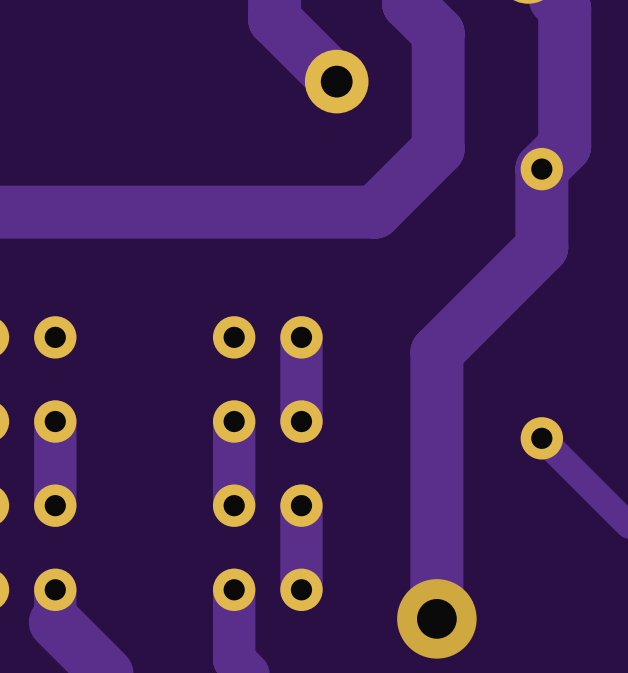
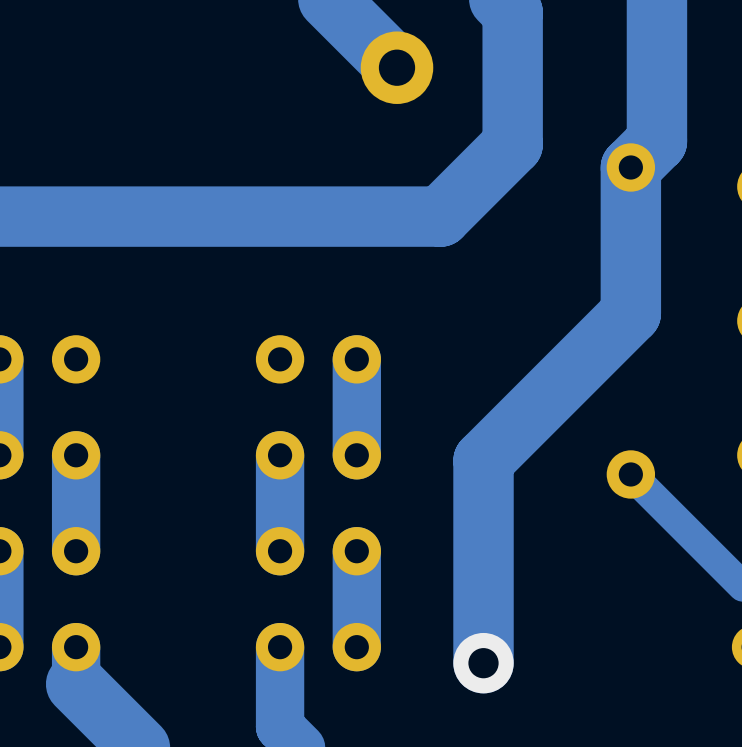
track: (541, 247) (436, 352) (436, 618) -> (630, 256) (630, 313) (483, 460) (483, 663)
via: none -> (483, 663)
via: (436, 618) -> none

